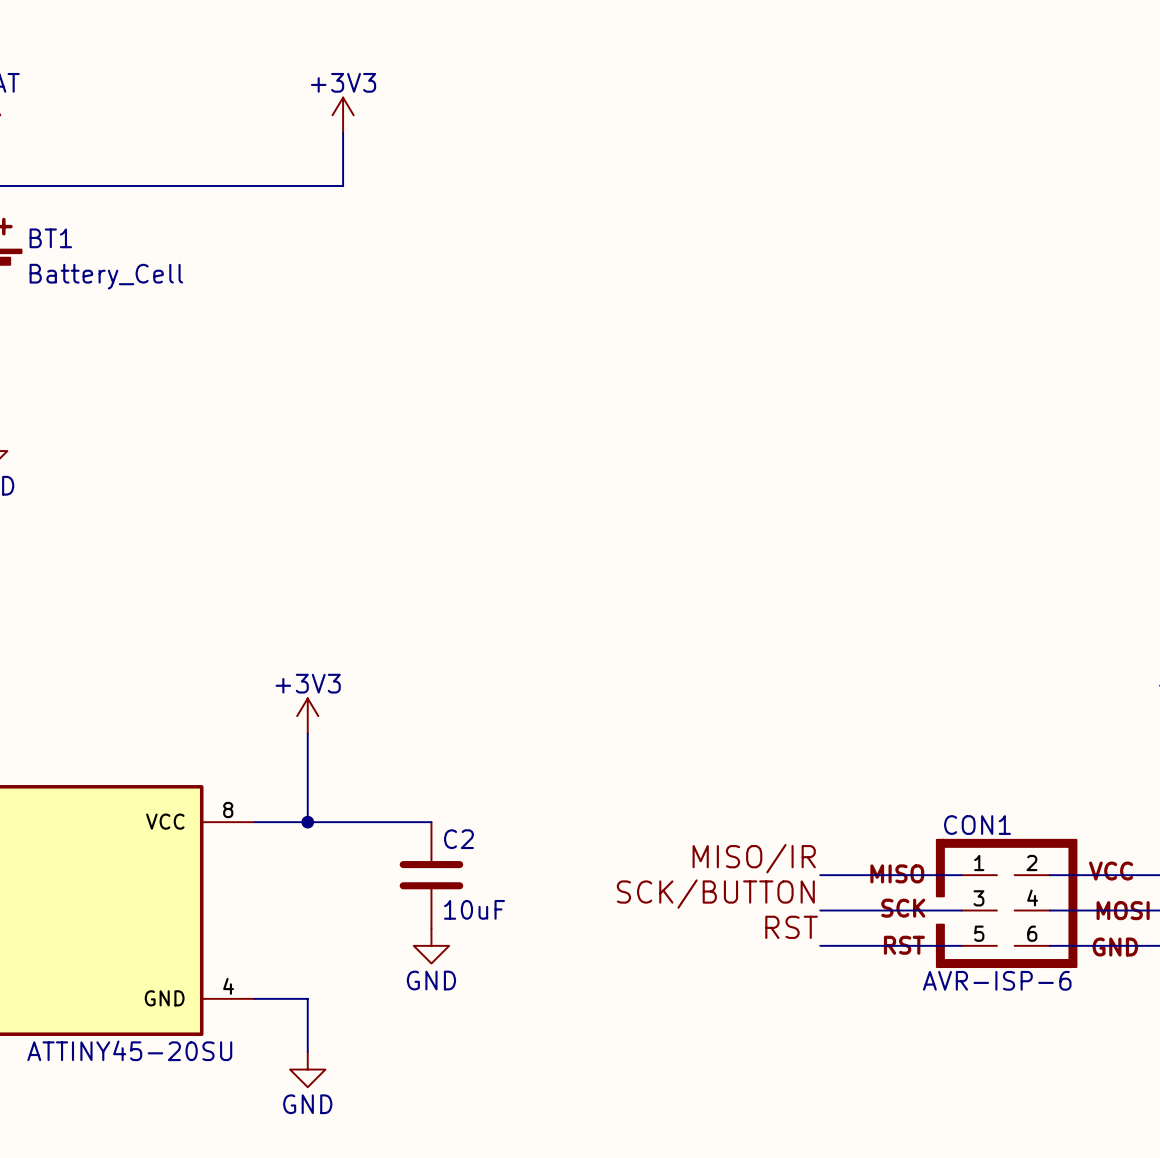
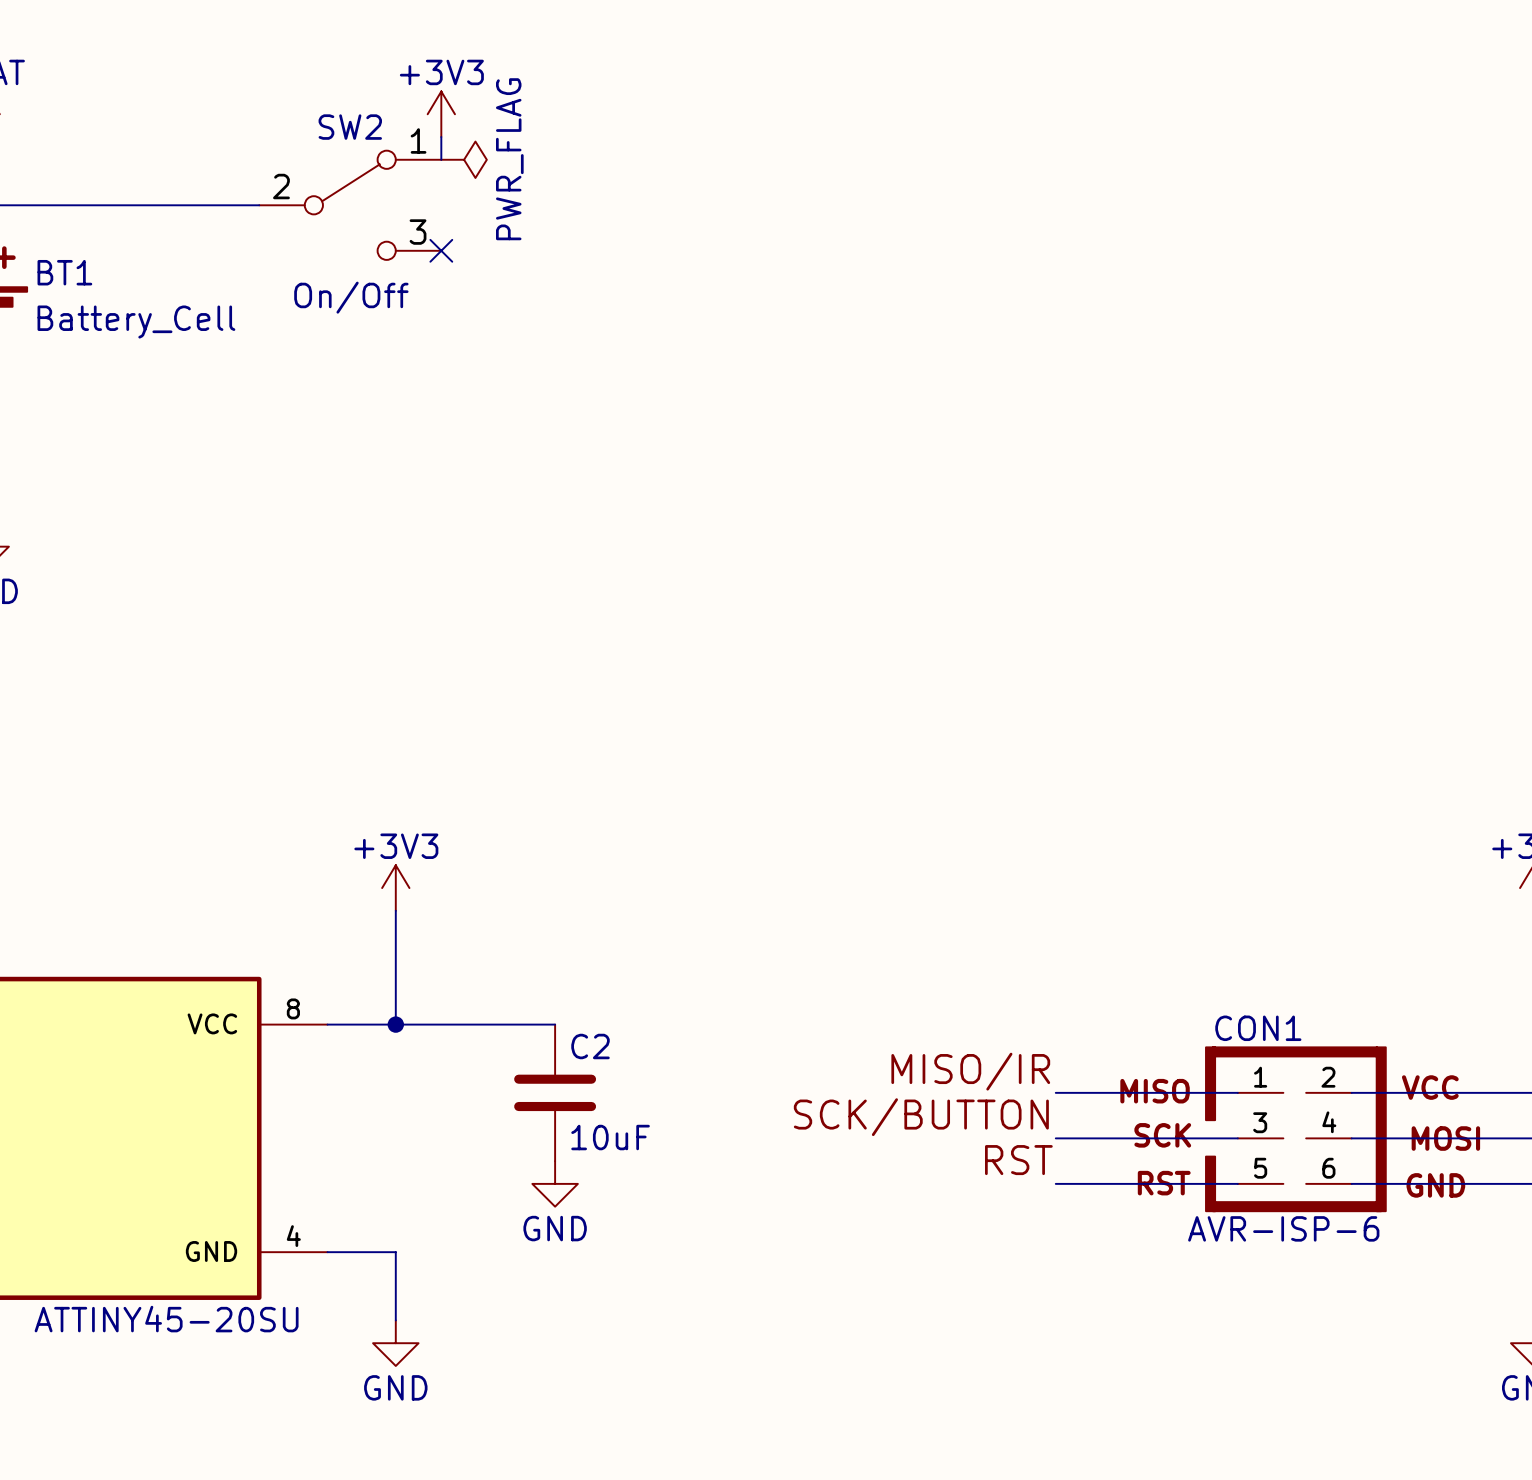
wire: (343, 150) (343, 185) (201, 185) -> none
power symbol: none -> PWR_FLAG (464, 159)
SW2: none -> On/Off (350, 205)
no-connect mark: none -> (441, 250)

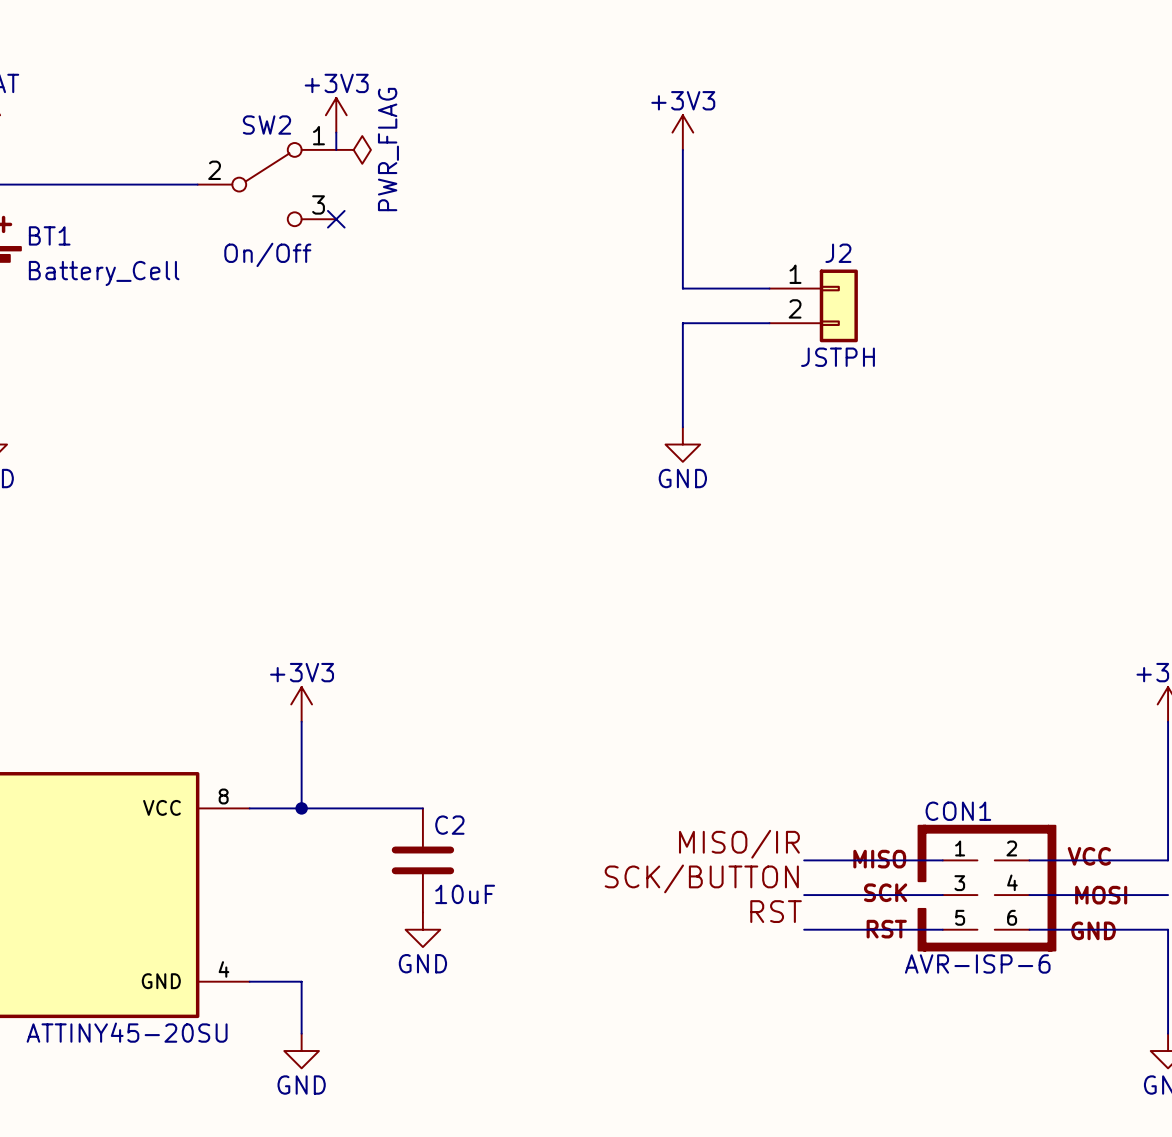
power symbol: none -> +3V3 (682, 132)
wire: none -> (682, 149) (682, 288) (769, 288)
J2: none -> JSTPH (813, 305)
wire: none -> (769, 323) (682, 323) (682, 427)
power symbol: none -> GND (682, 444)

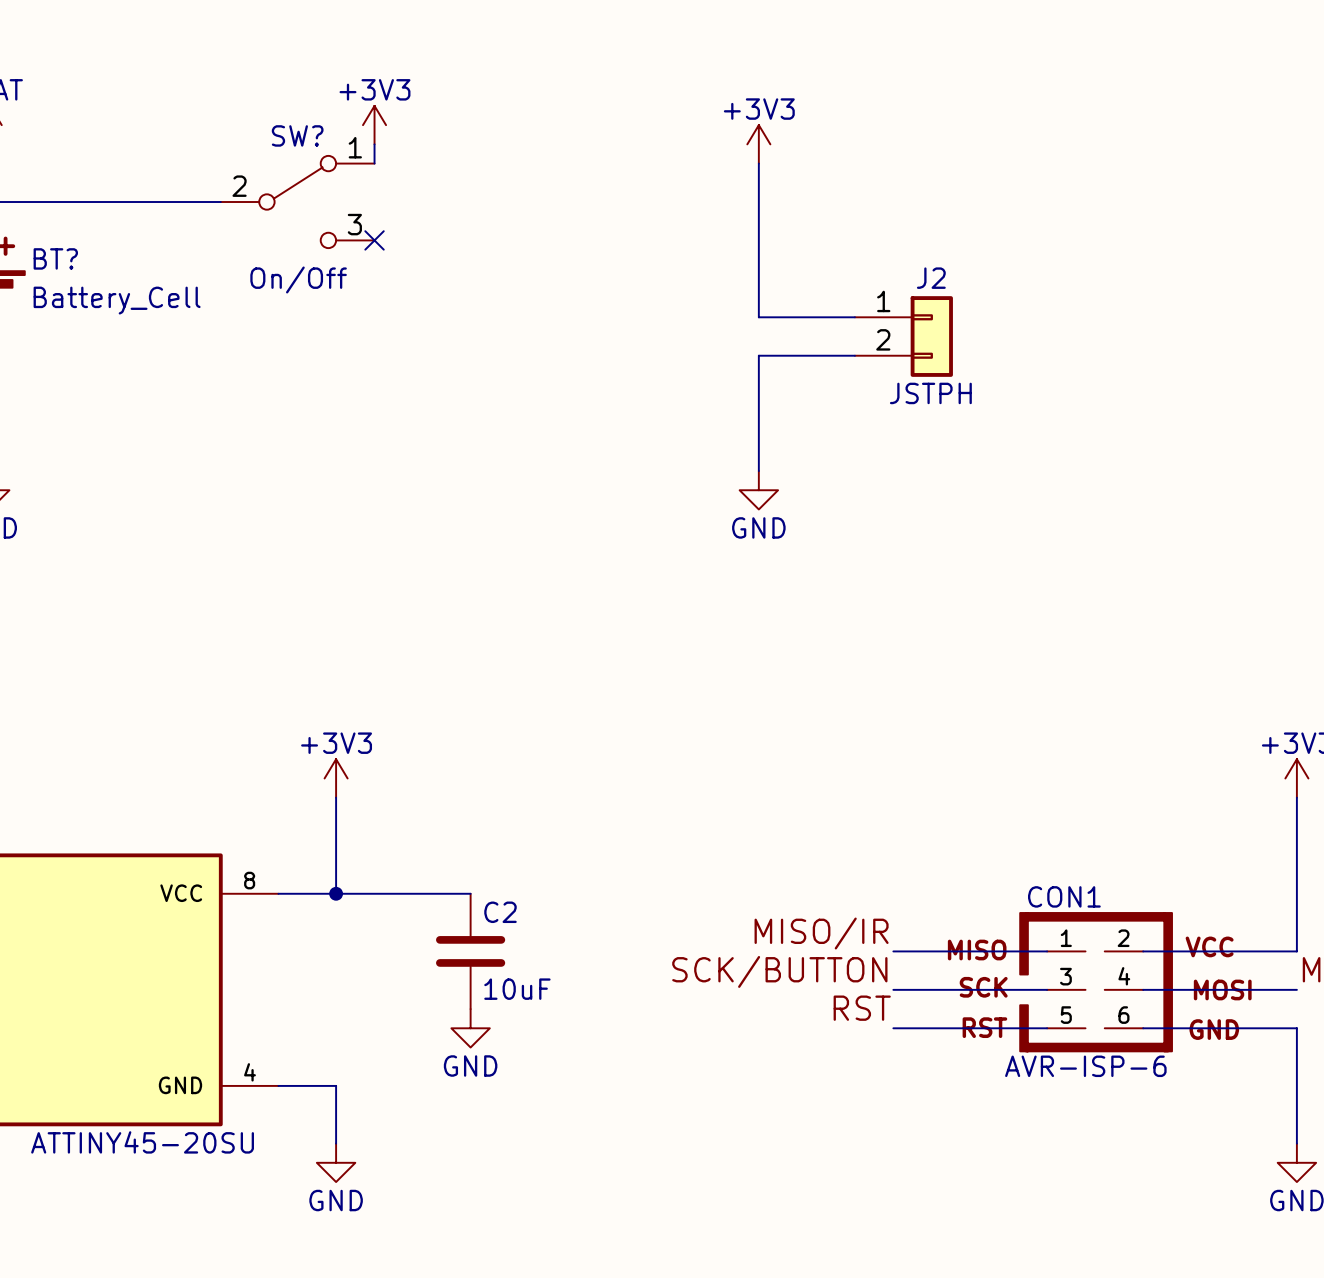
SW2 name: SW2 (266, 125) -> SW? (297, 135)
power symbol: PWR_FLAG (353, 149) -> none
BT1 name: BT1 (49, 235) -> BT? (55, 258)

